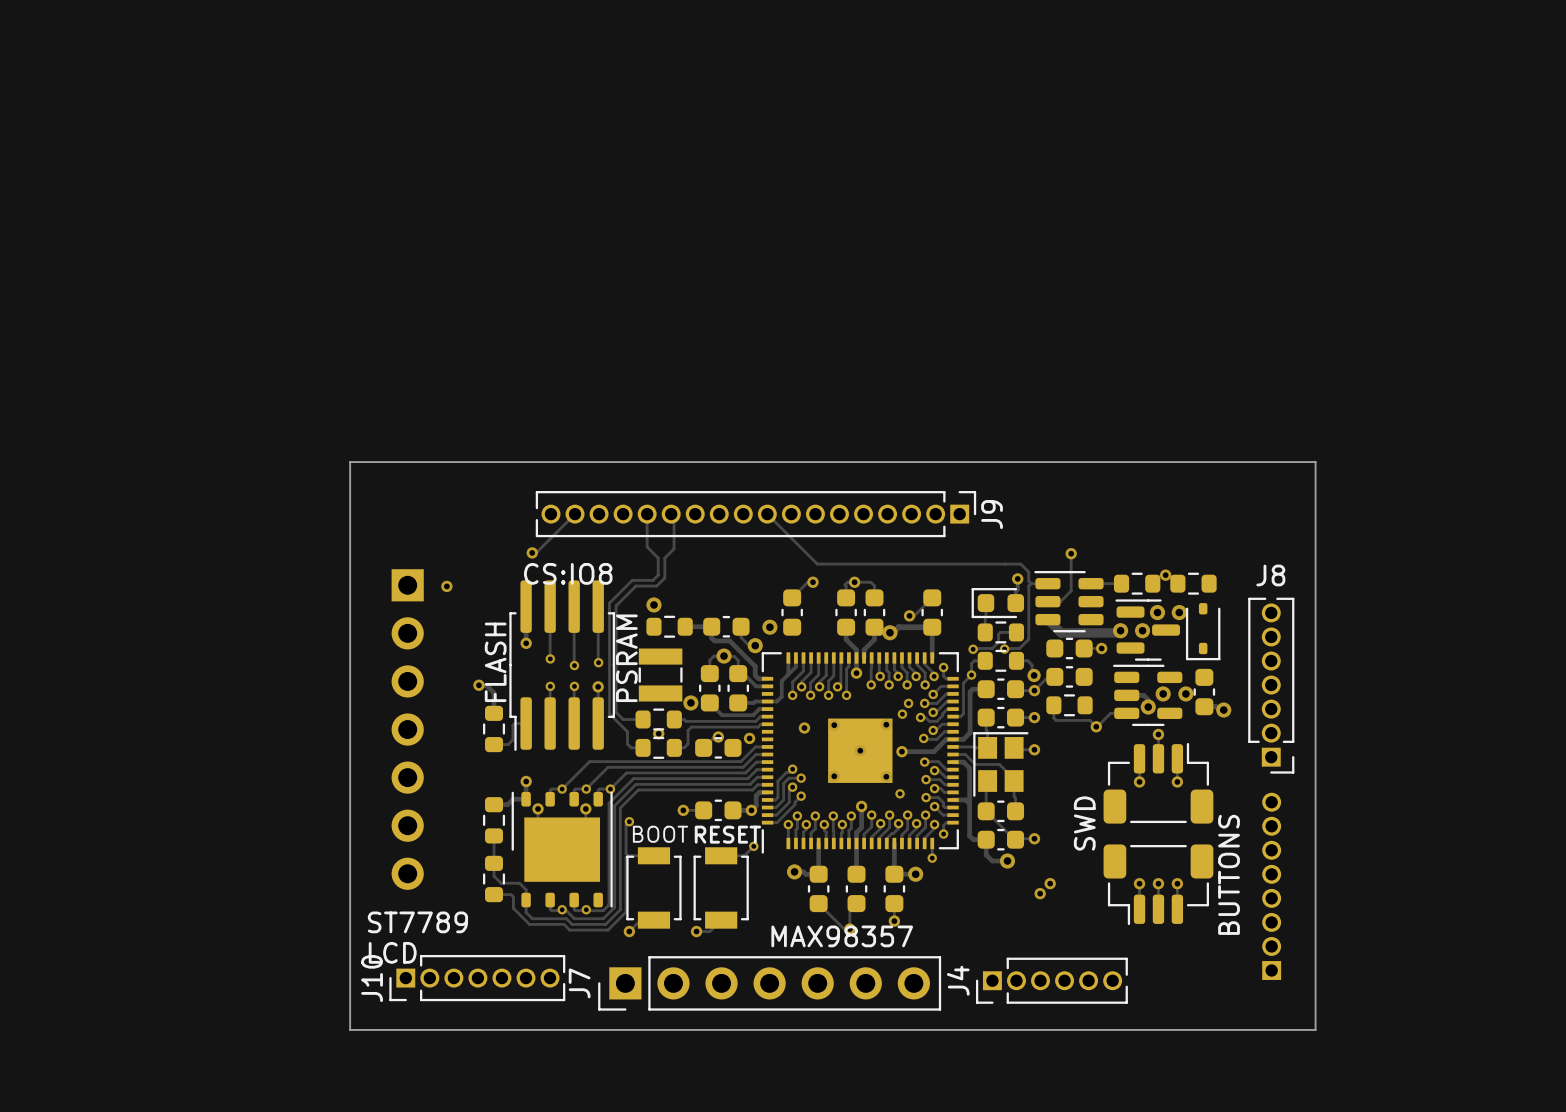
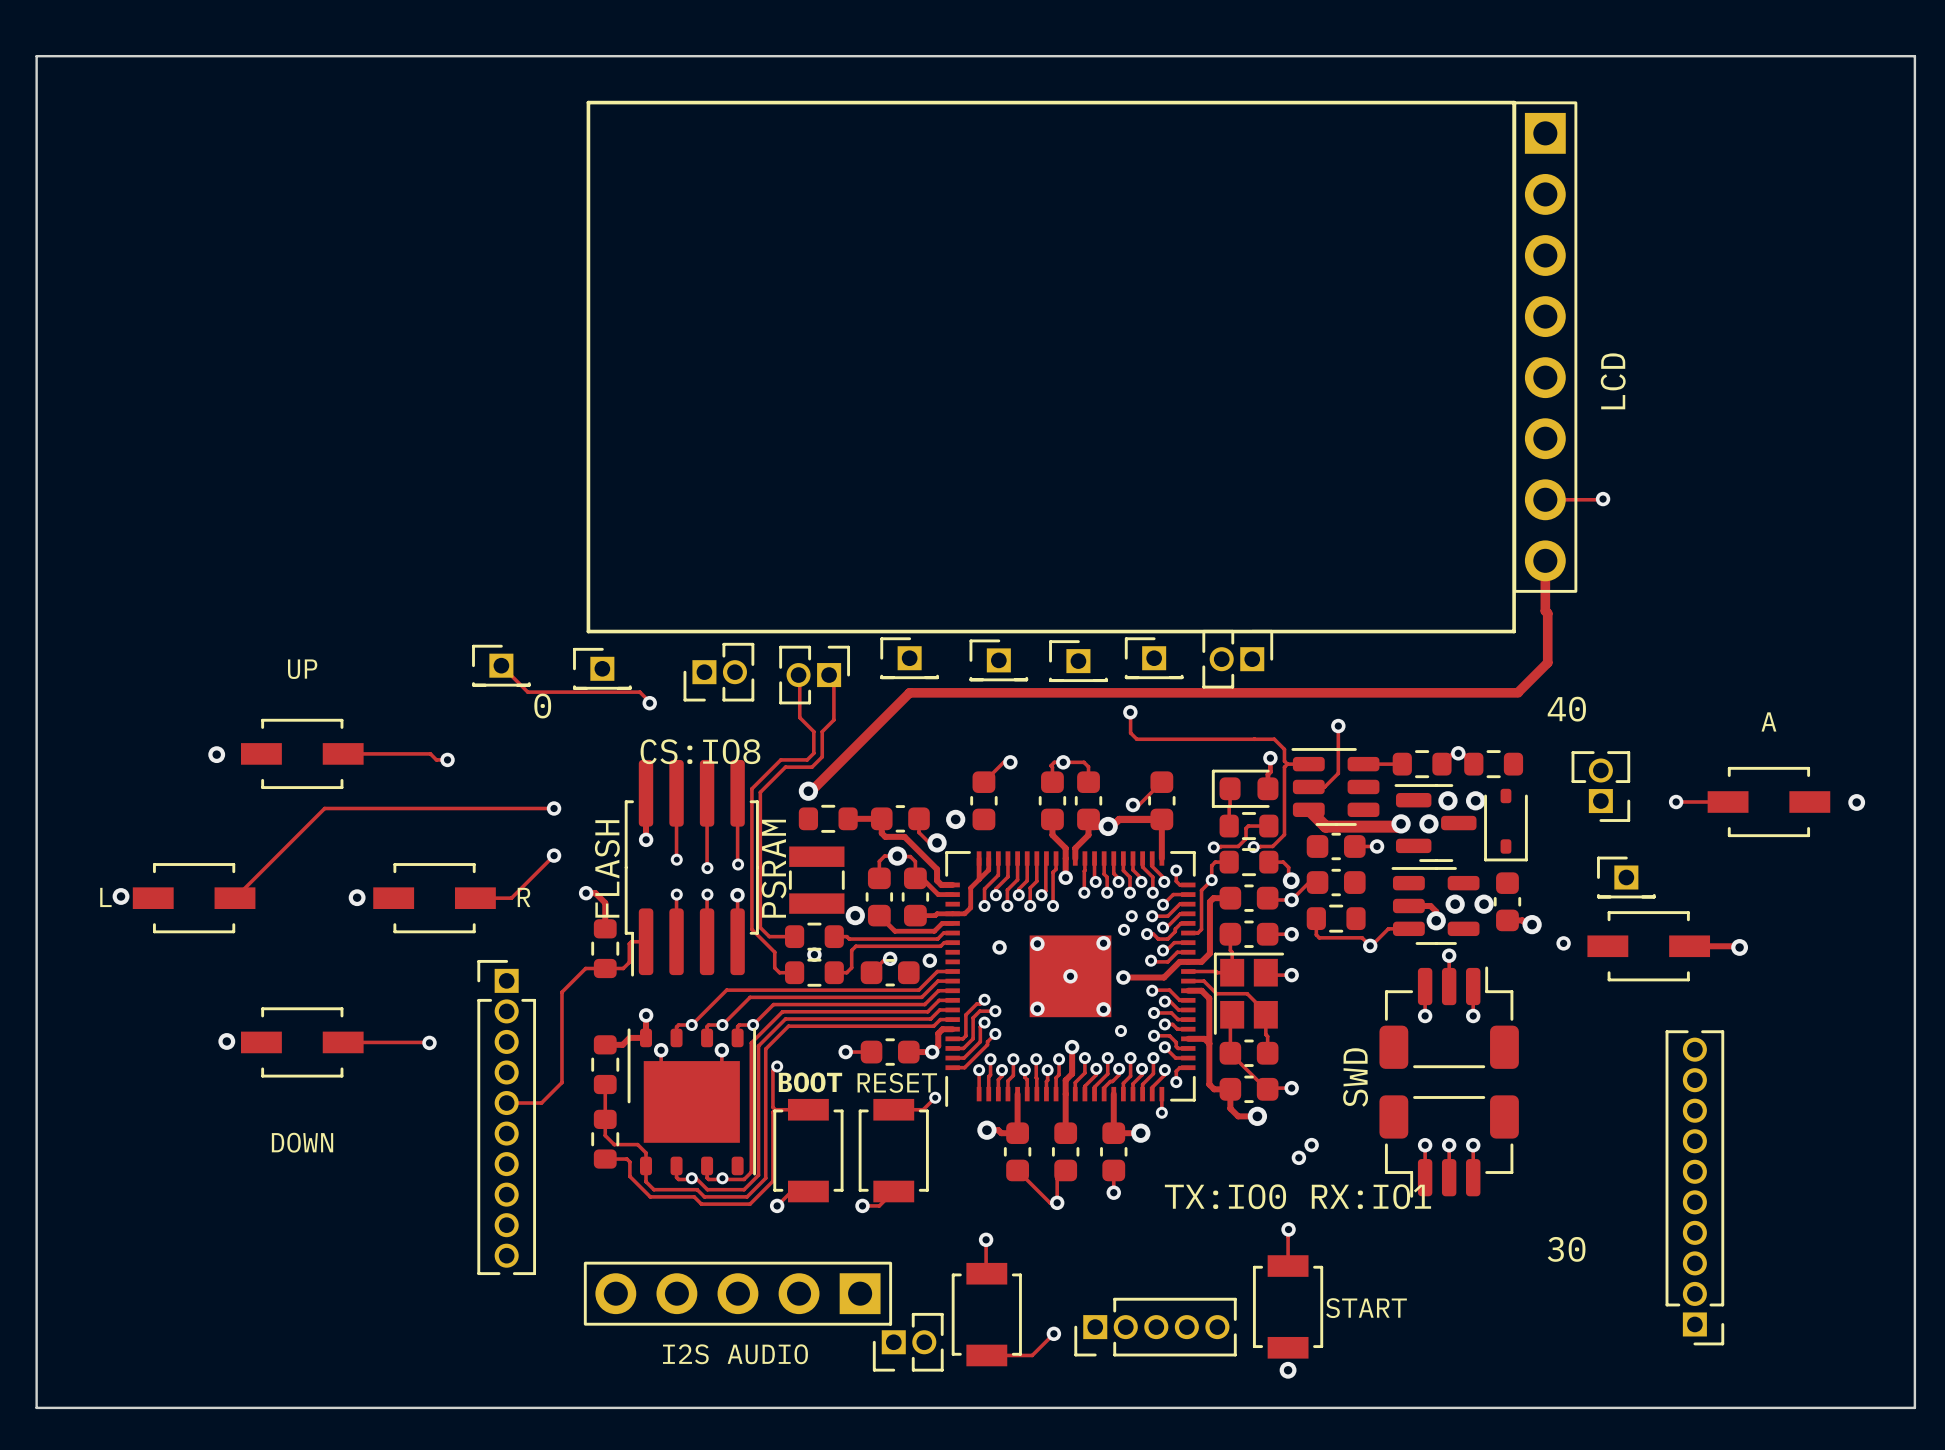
board edge: none -> (36, 56) (1914, 56) (1914, 1407) (36, 1407) (36, 56)
line: none -> (588, 102) (1514, 102) (1514, 631) (588, 631) (588, 102)
part: none -> (1545, 347)
text: none -> LCD (1613, 381)
track: none -> (1603, 499) (1545, 499)
via: none -> (1603, 499)
track: none -> (1545, 560) (1547, 662) (1518, 692)
board edge: (350, 462) (1315, 462) (1315, 1029) (350, 1029) (350, 462) -> none
part: none -> (909, 658)
part: none -> (1154, 658)
part: none -> (998, 660)
part: none -> (1237, 659)
part: none -> (1078, 661)
track: none -> (501, 665) (527, 692) (639, 692) (649, 703)
part: none -> (501, 665)
text: none -> UP (302, 669)
part: none -> (602, 668)
part: none -> (718, 672)
part: none -> (814, 675)
track: (575, 514) (536, 552) (532, 552) -> none
J9: (755, 514) -> none
track: (767, 514) (817, 564) (912, 564) -> (1130, 712) (1130, 733) (1136, 739)
track: none -> (1518, 692) (909, 692) (811, 791)
text: none -> 0 (542, 706)
text: none -> 40 (1566, 709)
via: none -> (1130, 712)
text: none -> A (1768, 721)
via position: (532, 552) -> (649, 703)
part: none -> (302, 753)
track: none -> (343, 753) (430, 753) (436, 759) (447, 759)
via: none -> (216, 754)
via: none -> (447, 759)
via position: (446, 586) -> (554, 808)
part: none -> (1600, 786)
track: none -> (1676, 802) (1728, 802)
via: none -> (1676, 802)
part: none -> (1768, 802)
via: none -> (1856, 802)
track: none -> (554, 808) (324, 808) (234, 898)
track: none -> (554, 855) (511, 898) (475, 898)
via: none -> (554, 855)
part: none -> (1626, 877)
J8: (1271, 685) -> none
via: none -> (121, 896)
text: none -> L (105, 897)
via: none -> (357, 897)
text: none -> R (524, 897)
part: none -> (194, 898)
part: none -> (434, 898)
via: none -> (1563, 943)
part: none -> (1648, 946)
track: none -> (1689, 946) (1739, 947)
via: none -> (1739, 947)
part: (407, 729) -> none
track: none -> (605, 968) (585, 968) (561, 992) (561, 1082) (541, 1103) (506, 1103)
via: none -> (226, 1041)
part: none -> (302, 1042)
track: none -> (343, 1042) (429, 1042)
via: none -> (429, 1042)
part: none -> (506, 1117)
text: BUTTONS (1229, 874) -> none
text: none -> DOWN (302, 1142)
part: (1271, 886) -> none
part: none -> (1694, 1187)
text: ST7789 (417, 922) -> none
text: none -> TX:IO0 RX:IO1 (1297, 1196)
text: MAX98357 (842, 936) -> none
track: none -> (1288, 1229) (1288, 1266)
via: none -> (1288, 1229)
text: LCD (392, 952) -> none
track: none -> (986, 1239) (986, 1273)
via: none -> (986, 1239)
text: none -> 30 (1566, 1249)
J10: (477, 978) -> none
J4: (1051, 980) -> none
J7: (769, 983) -> none
part: none -> (737, 1293)
part: none -> (1288, 1306)
text: none -> START (1366, 1308)
part: none -> (986, 1314)
part: none -> (1155, 1327)
track: none -> (1053, 1333) (1032, 1355) (986, 1355)
via: none -> (1053, 1333)
part: none -> (908, 1342)
text: none -> I2S AUDIO (735, 1354)
via: none -> (1288, 1370)

